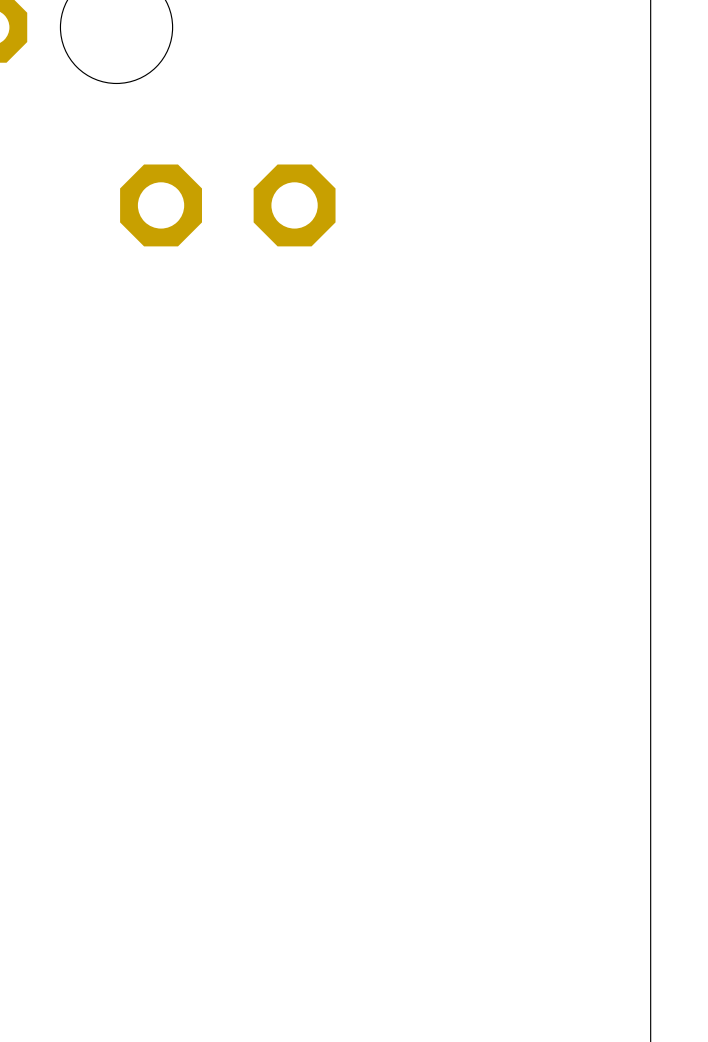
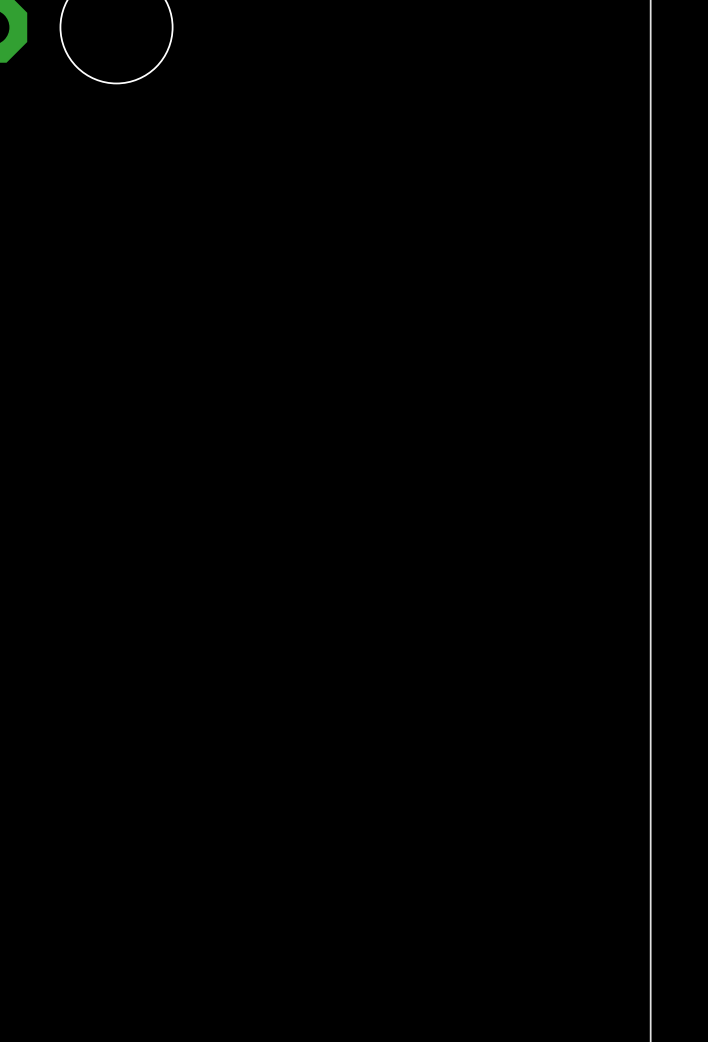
part: (161, 205) -> none
part: (294, 205) -> none

